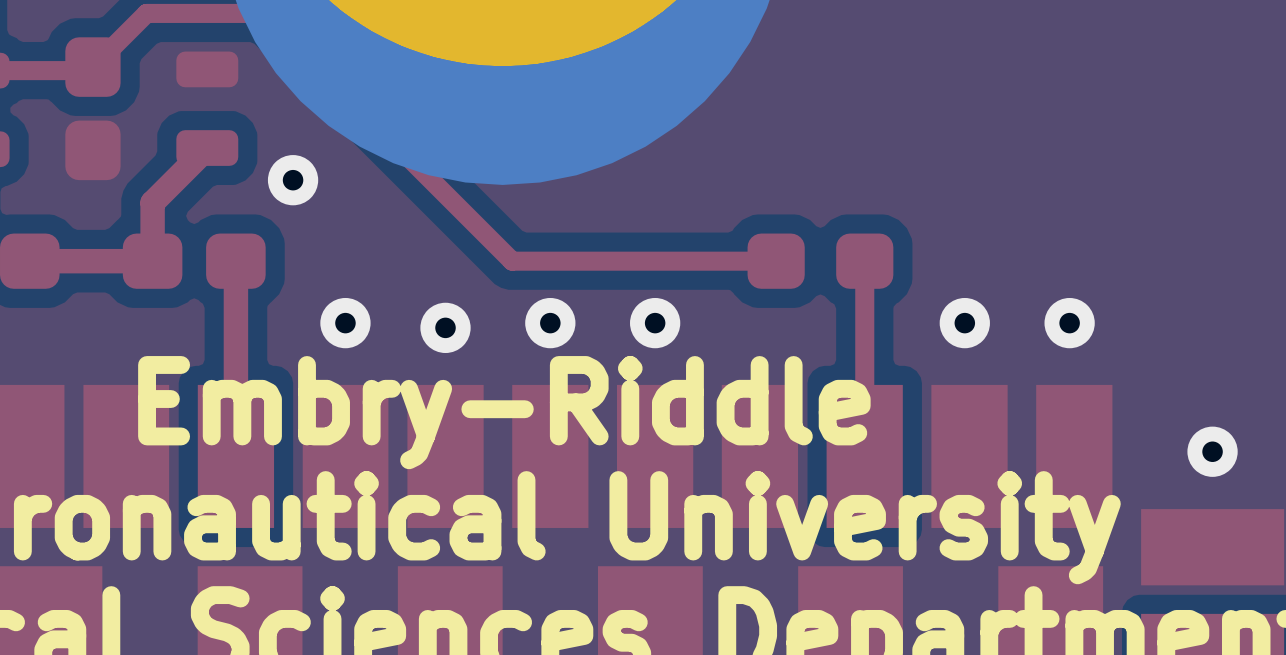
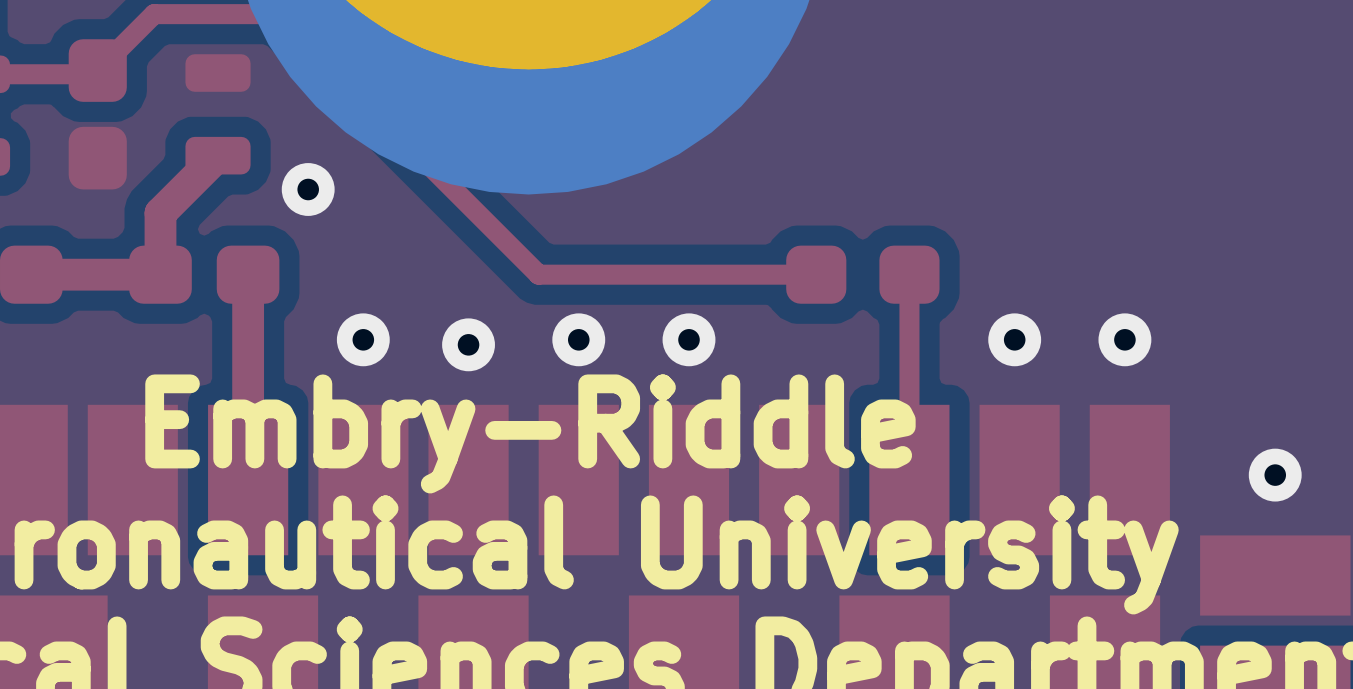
top track width: thin (207, 148) (152, 202) (152, 261) (29, 261) -> thick (218, 155) (160, 213) (160, 274) (31, 274)
top track width: thin (235, 261) (235, 456) -> thick (248, 274) (248, 480)

